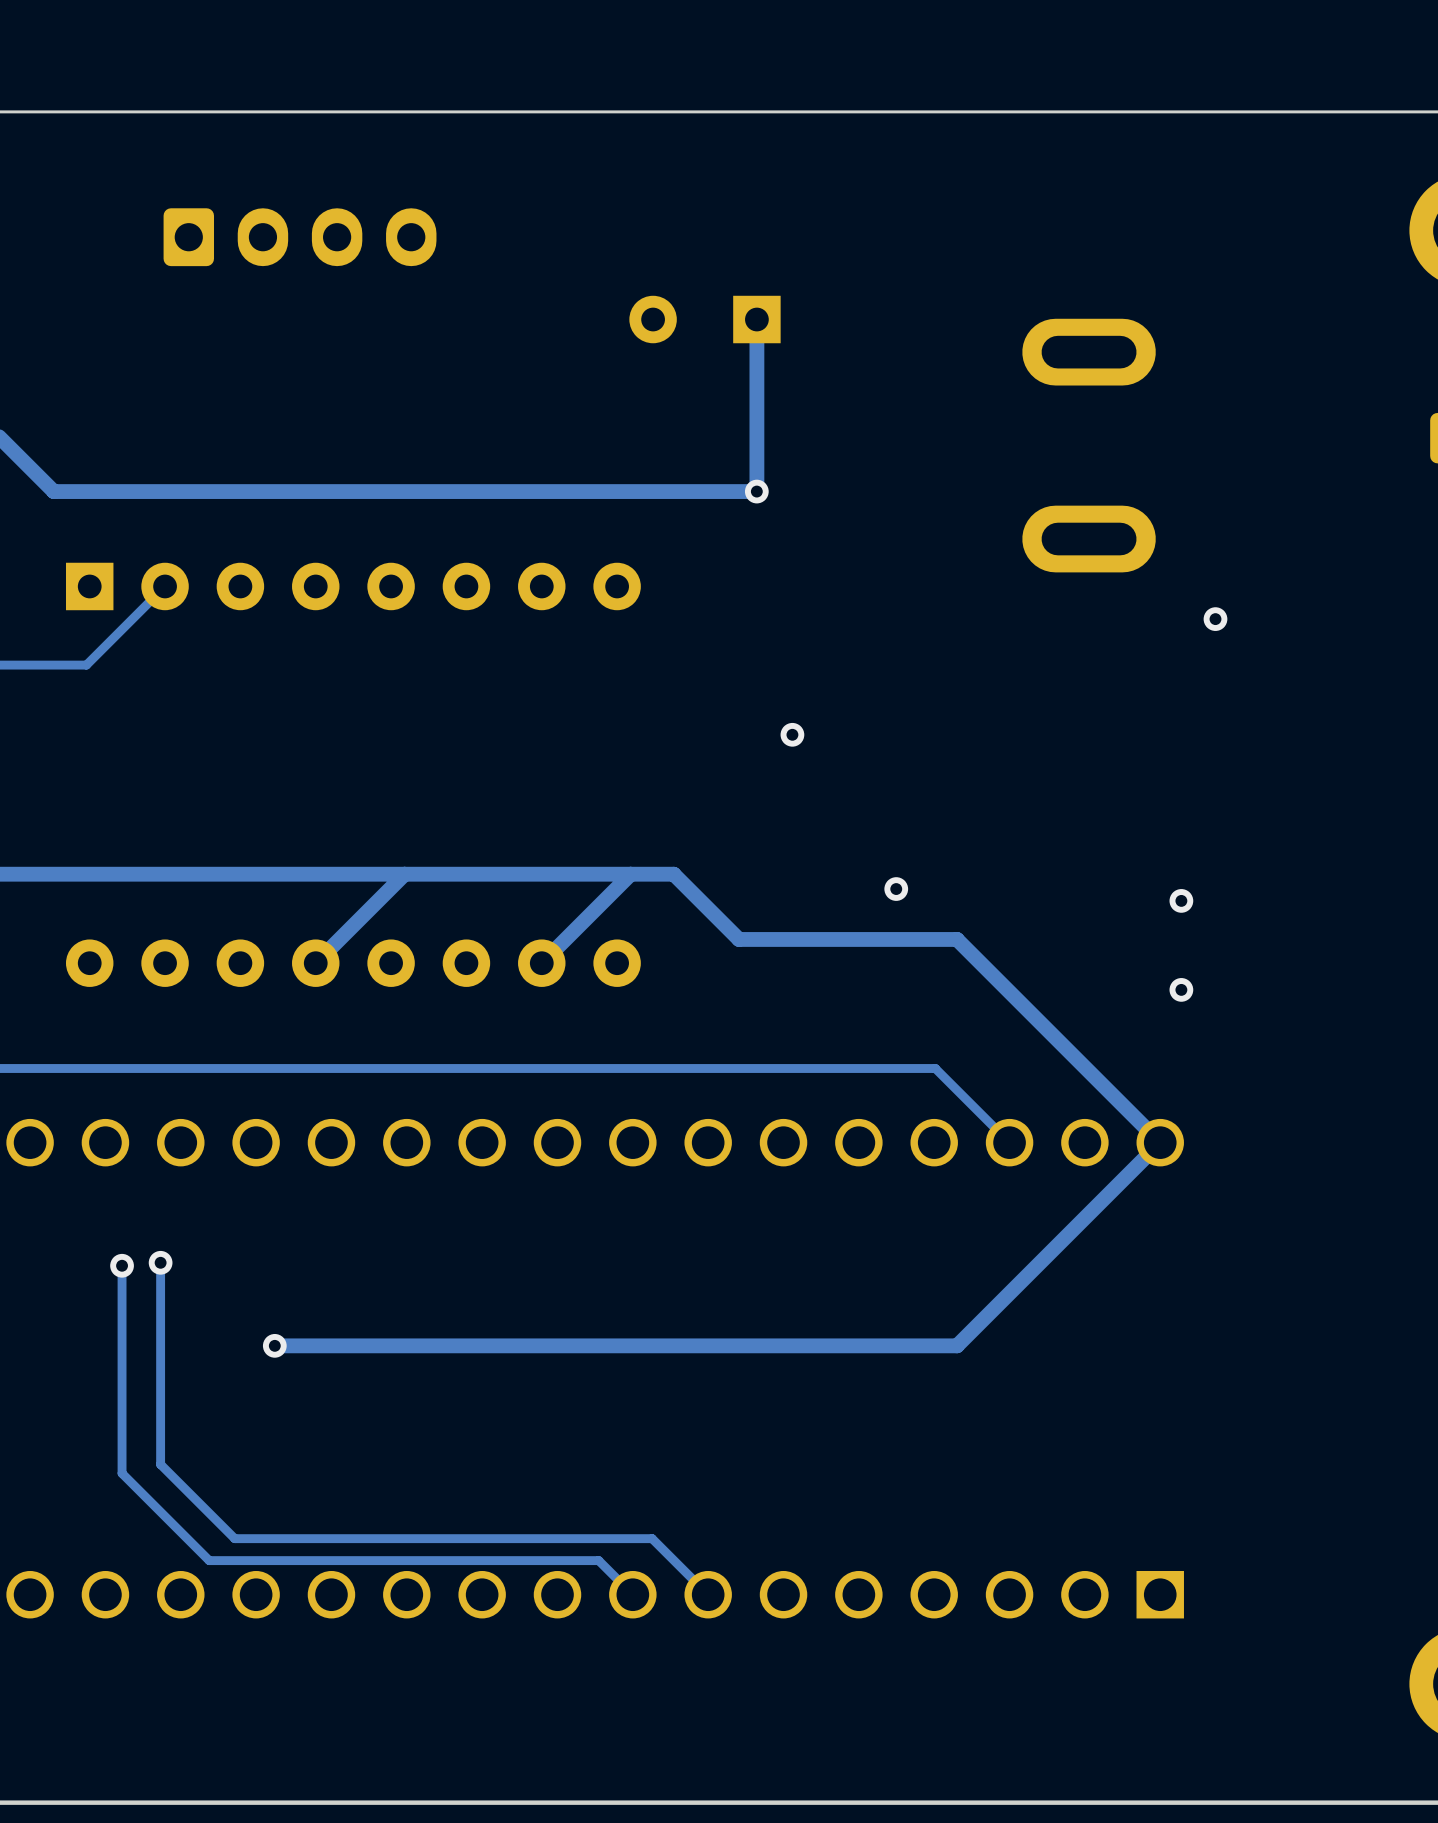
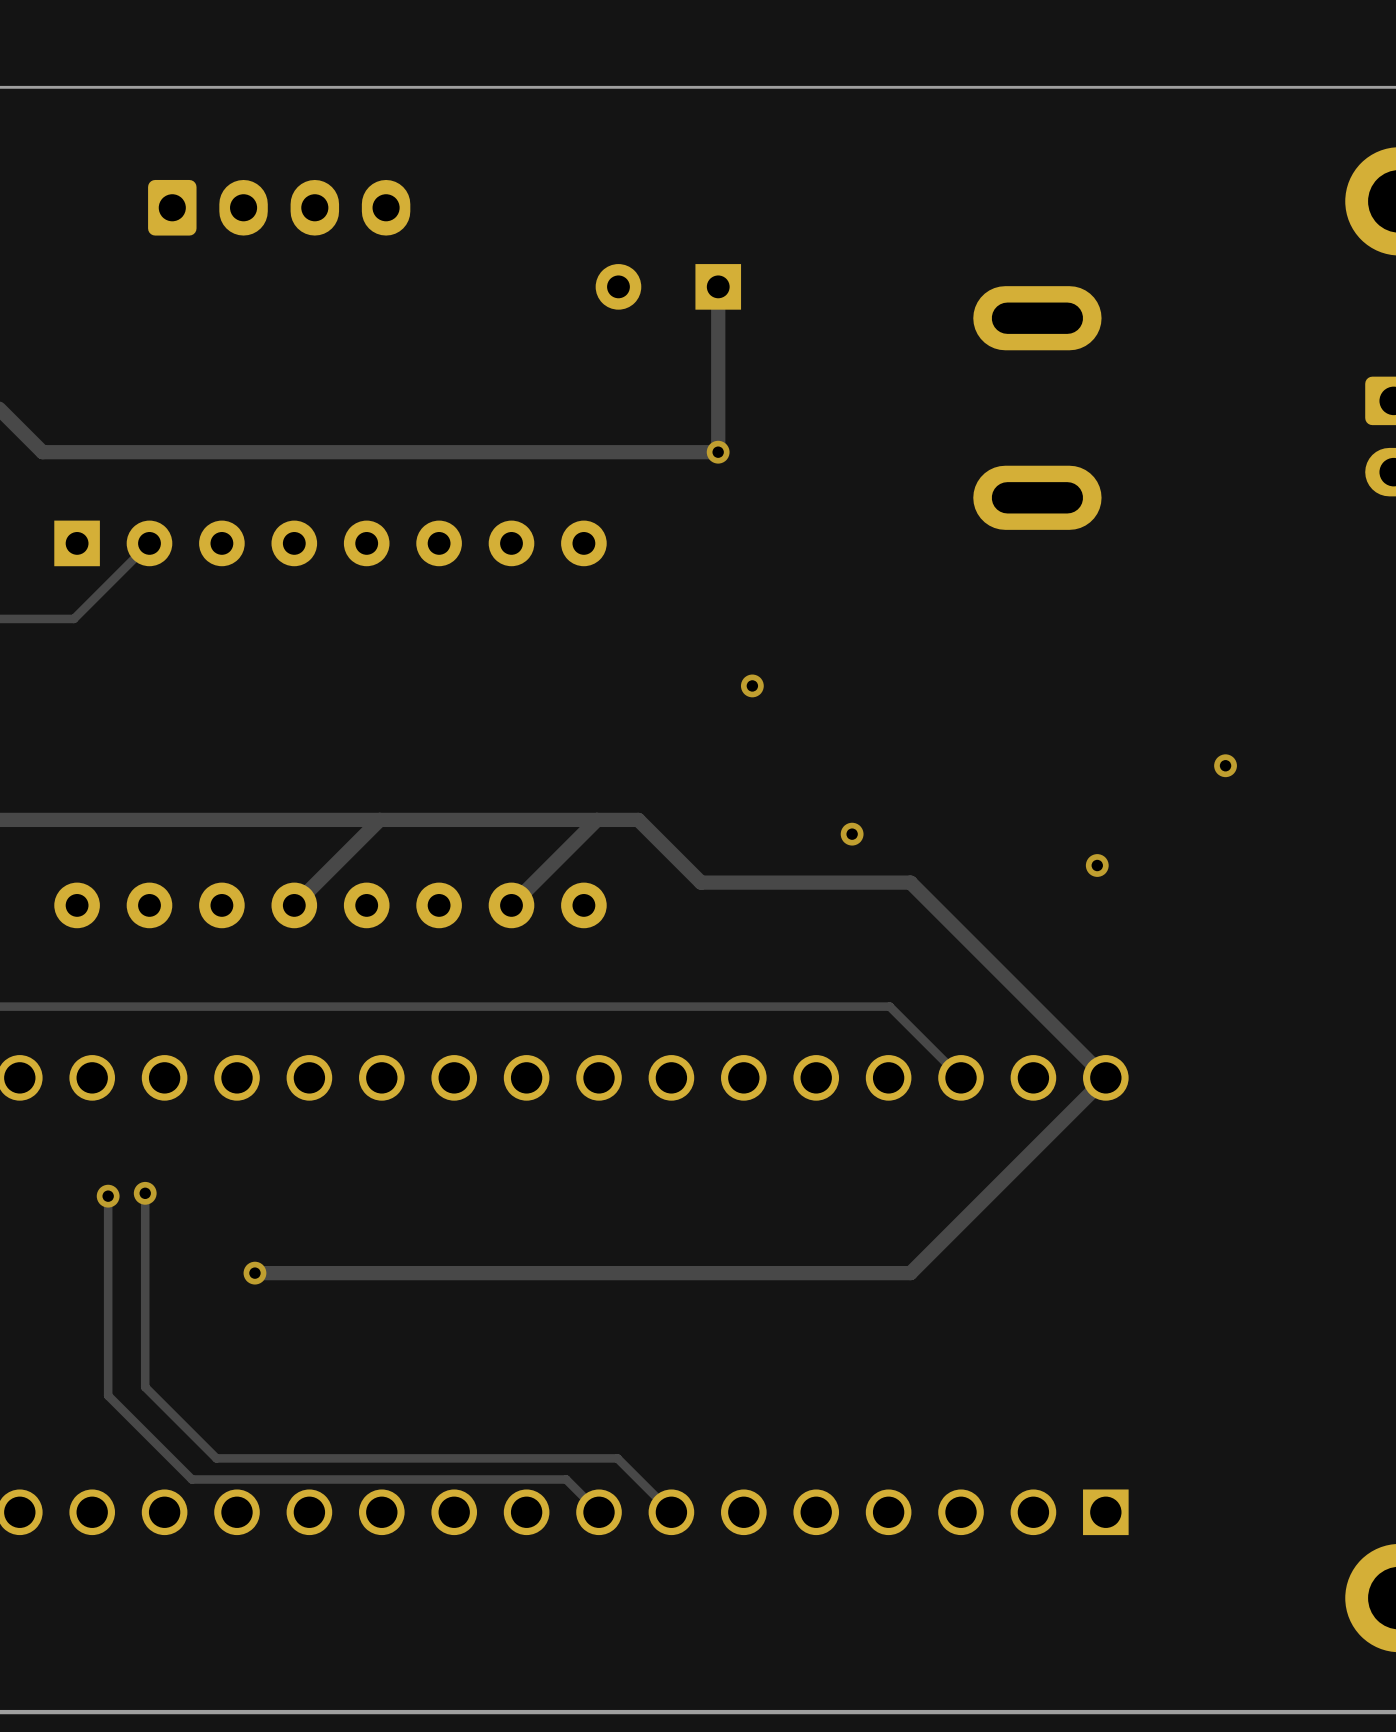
via: (1215, 619) -> none
via: none -> (1225, 765)
via position: (1181, 900) -> (1097, 865)
via: (1181, 989) -> none

